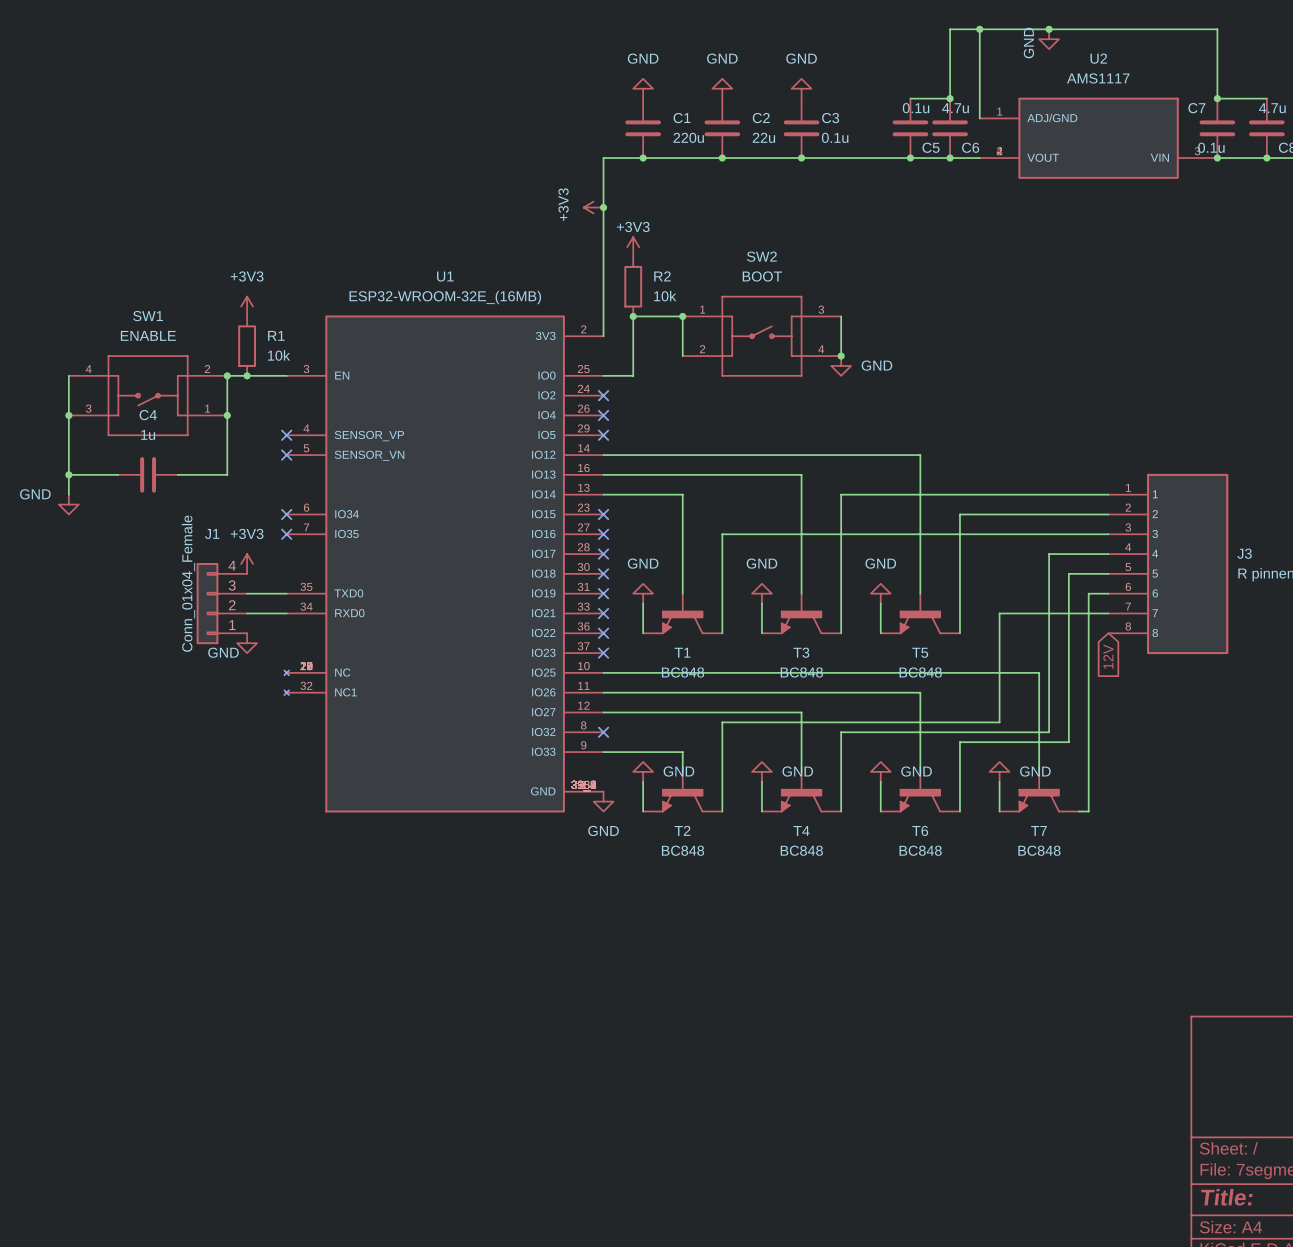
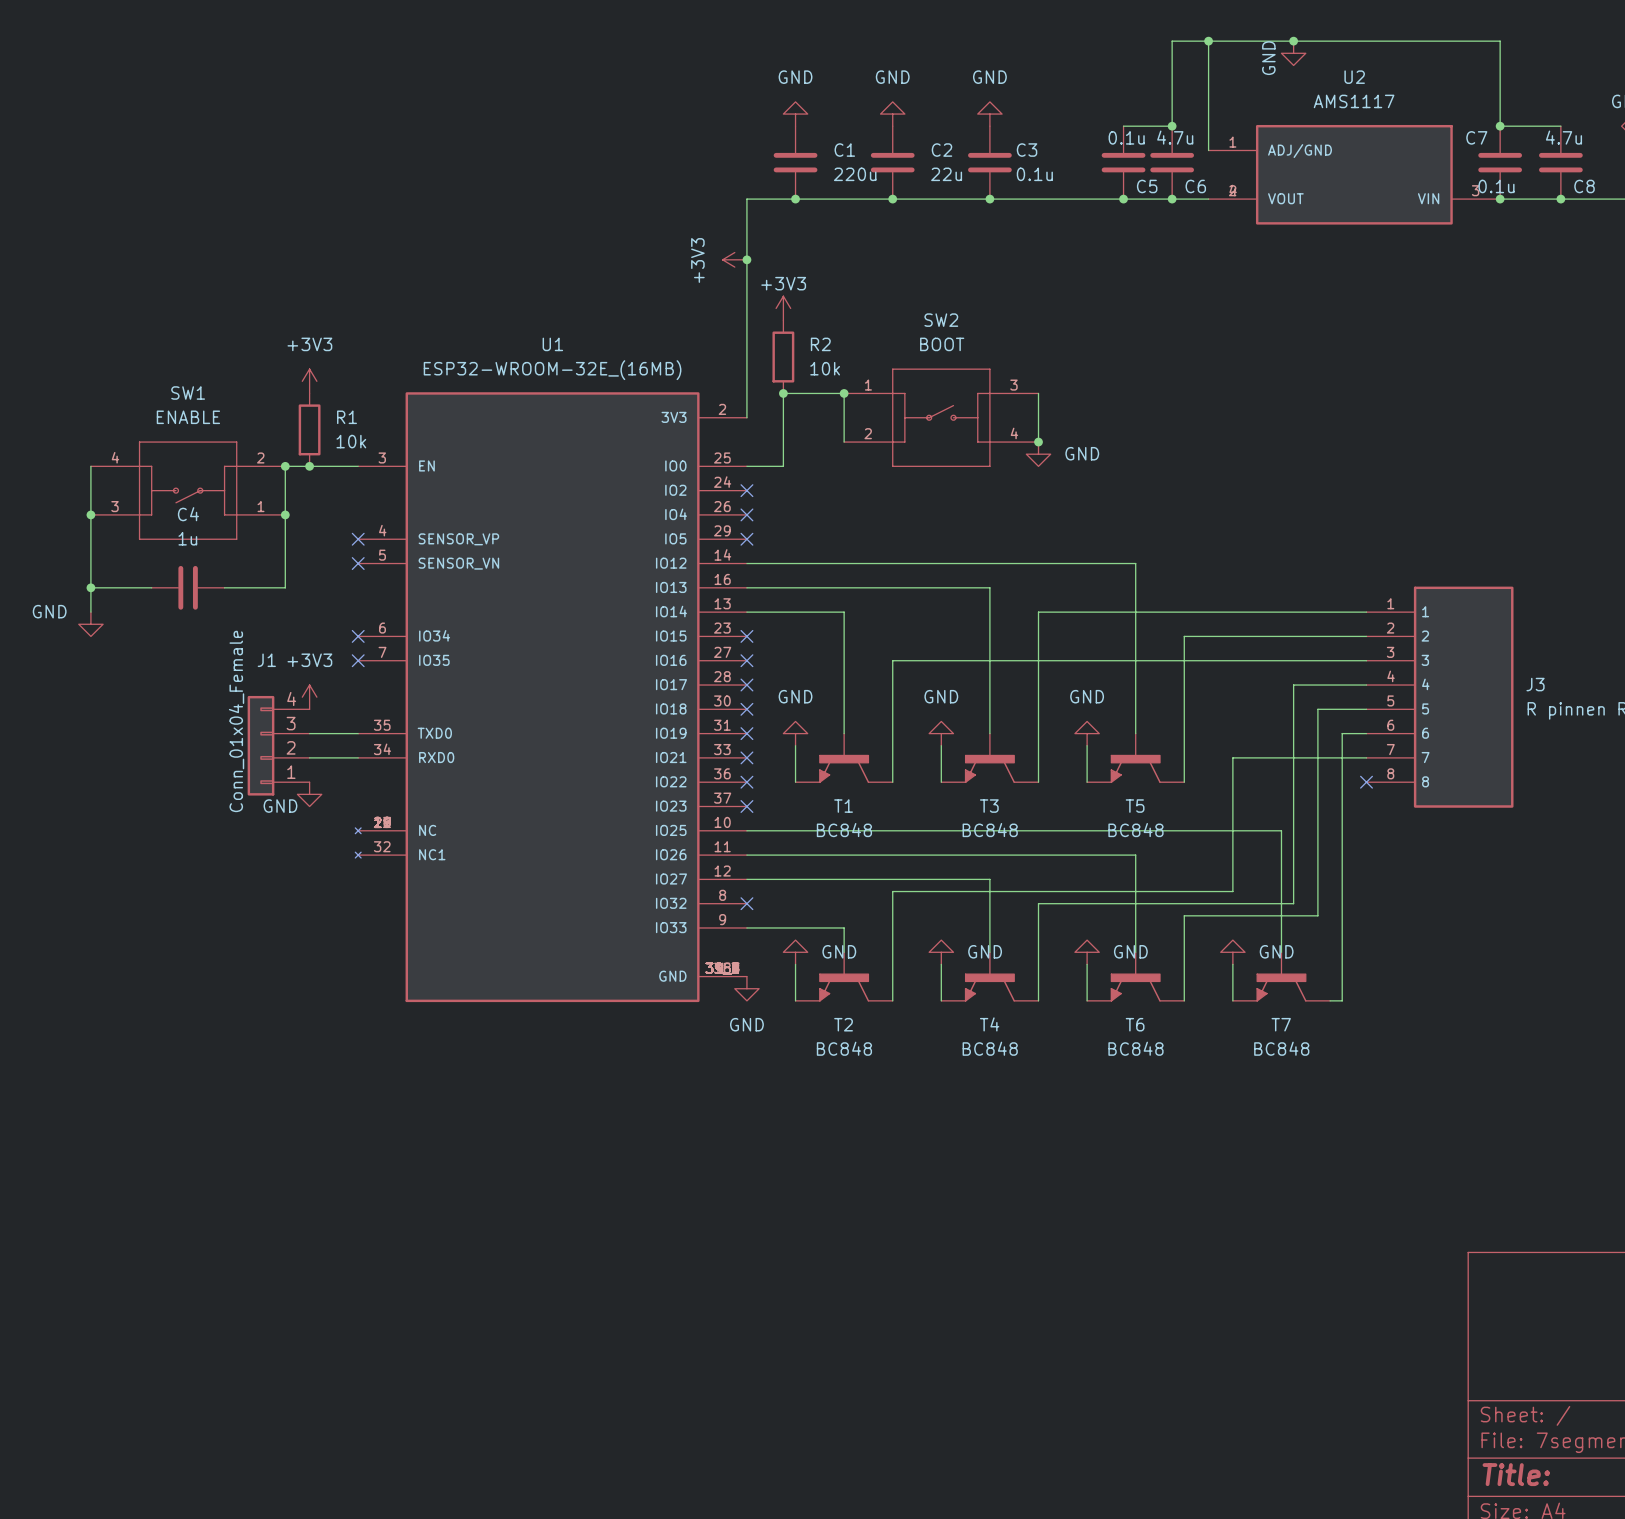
no-connect mark: none -> (1366, 782)
global label: 12V (1108, 656) -> none

